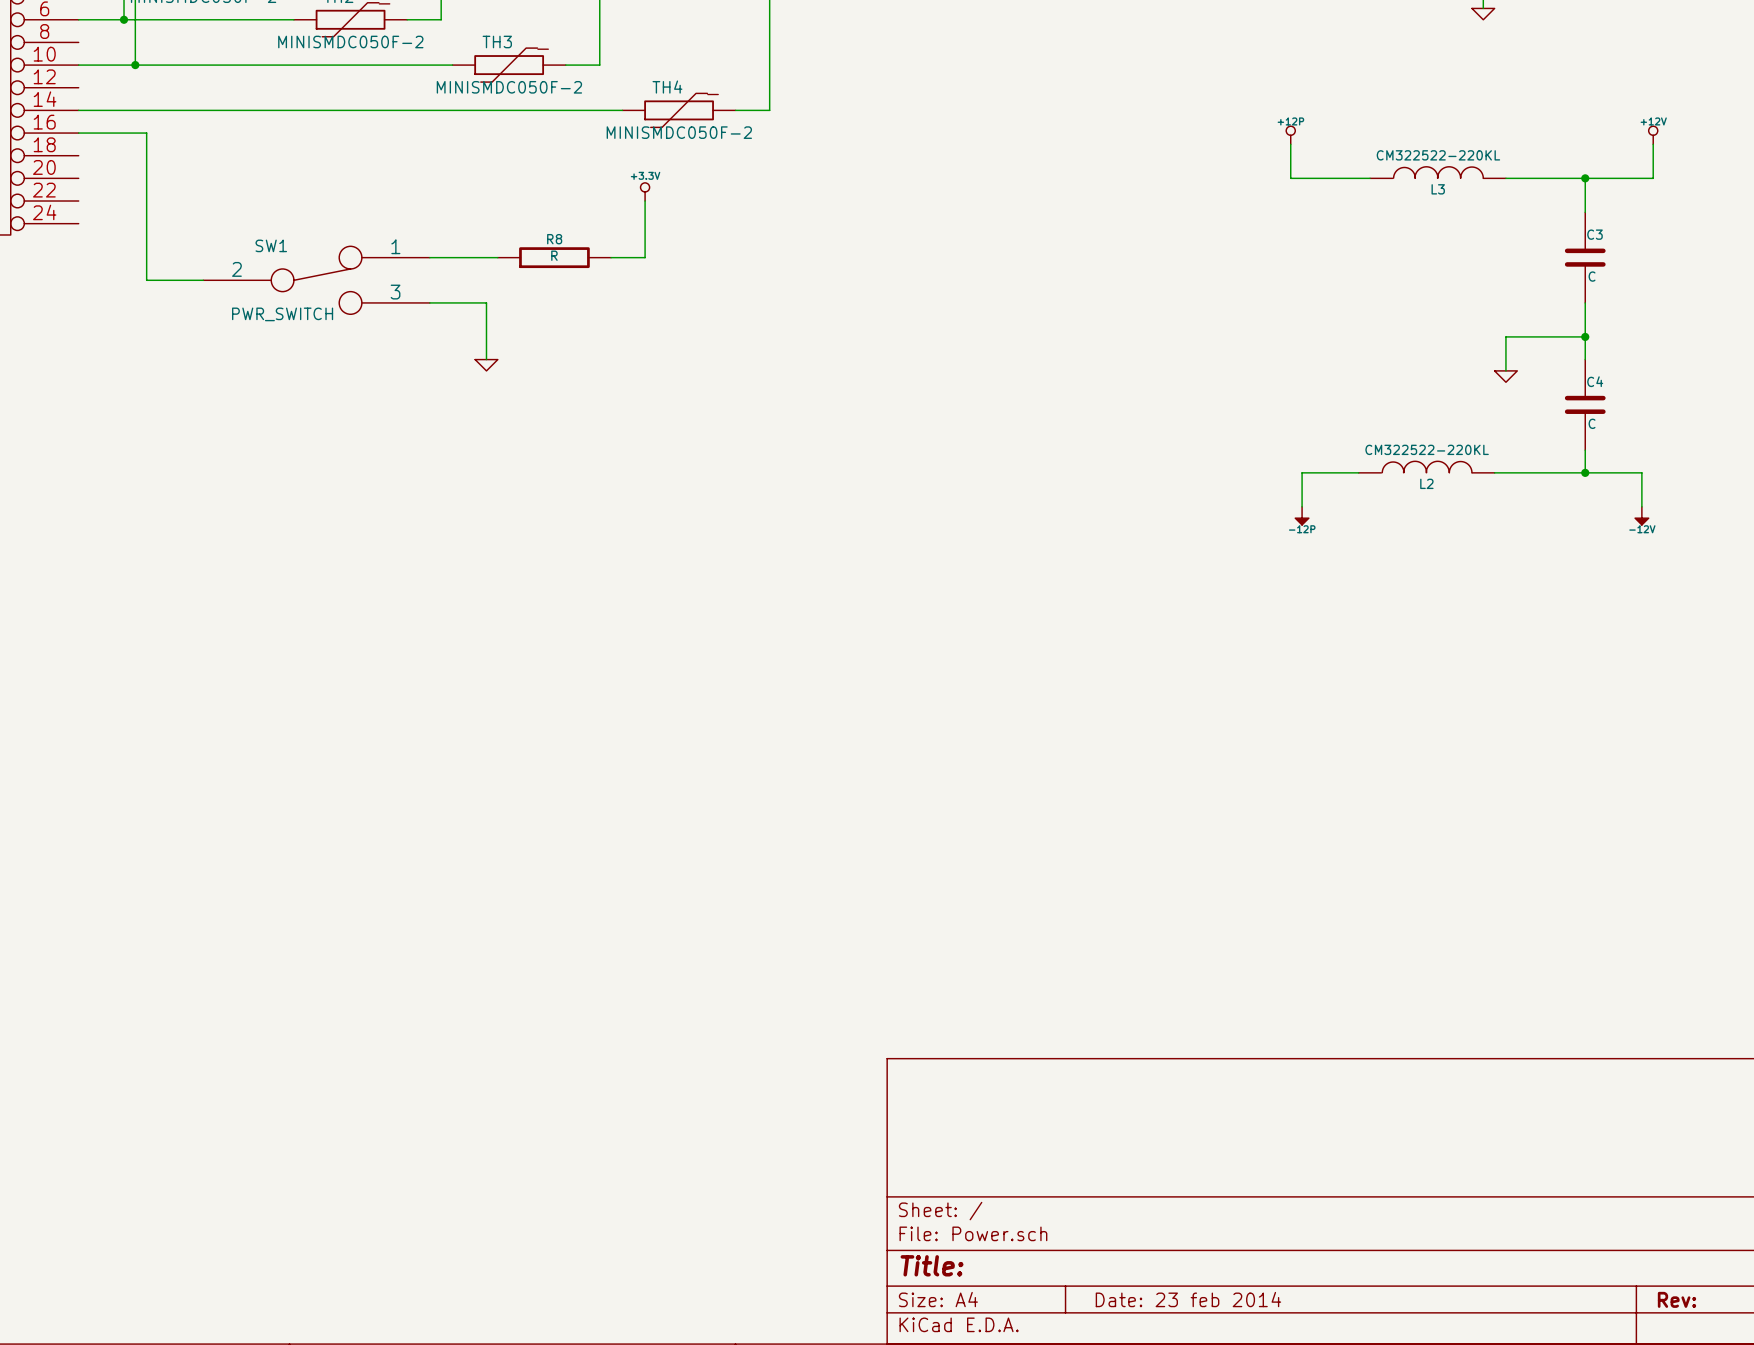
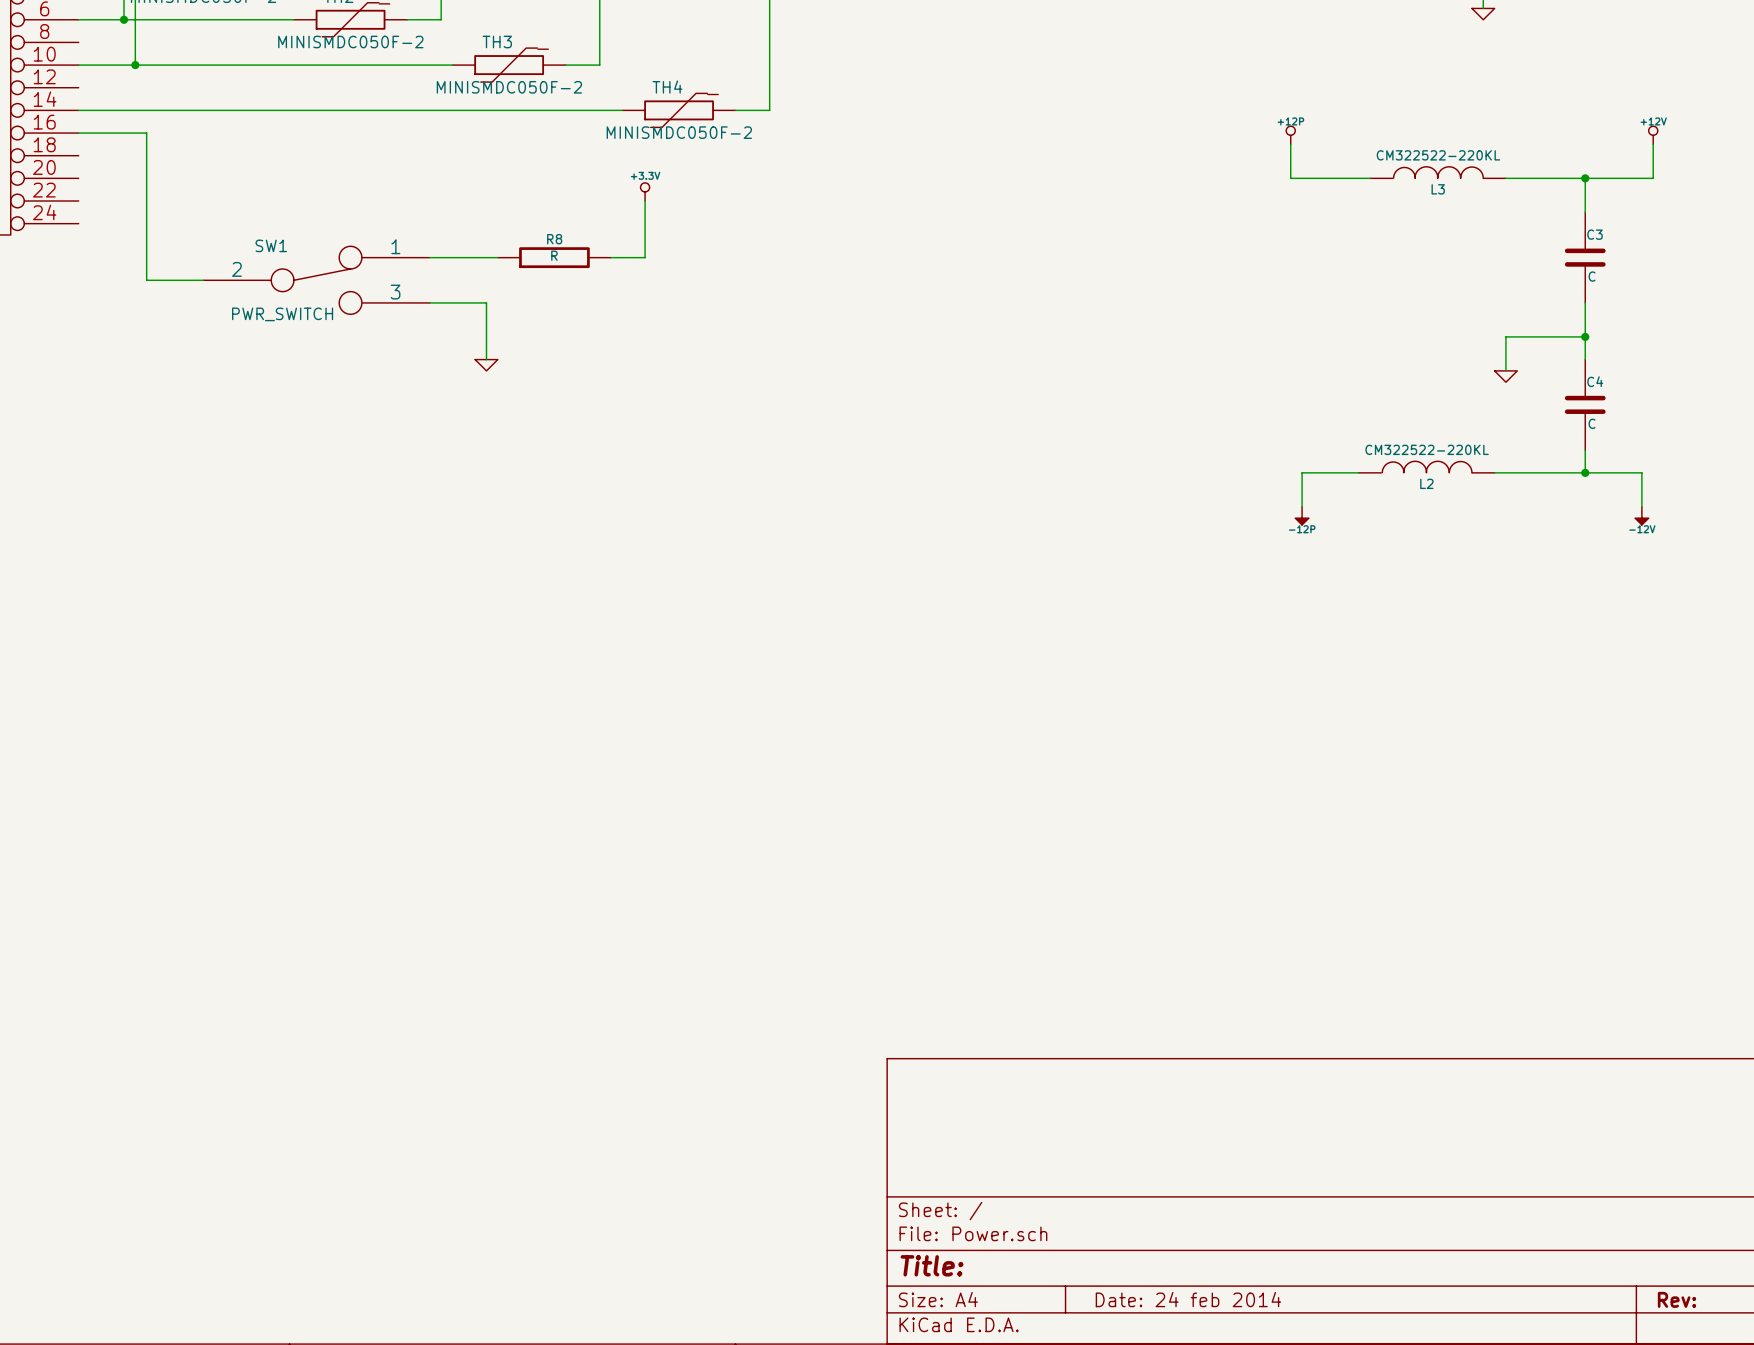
title block: Date: 23 feb 2014 (1188, 1299) -> Date: 24 feb 2014 (1188, 1299)

